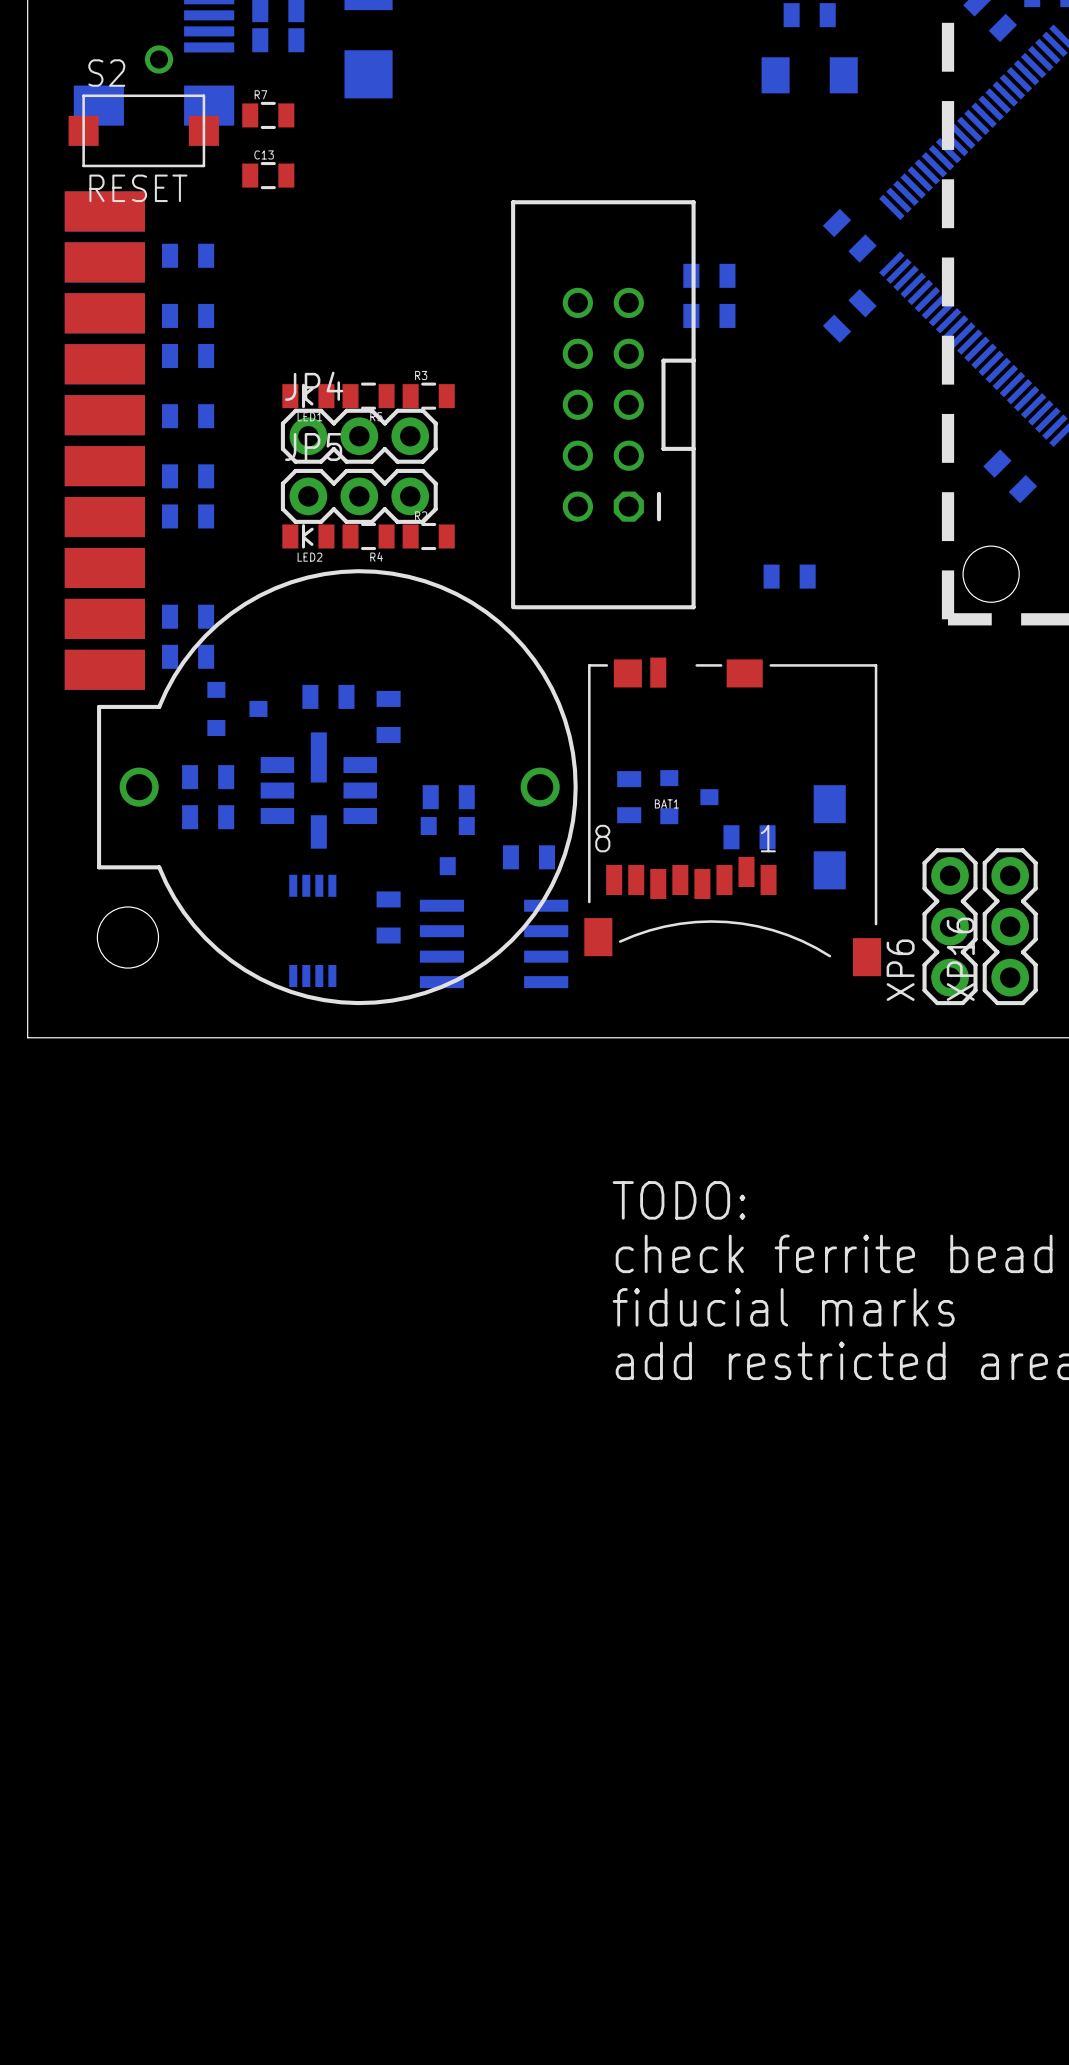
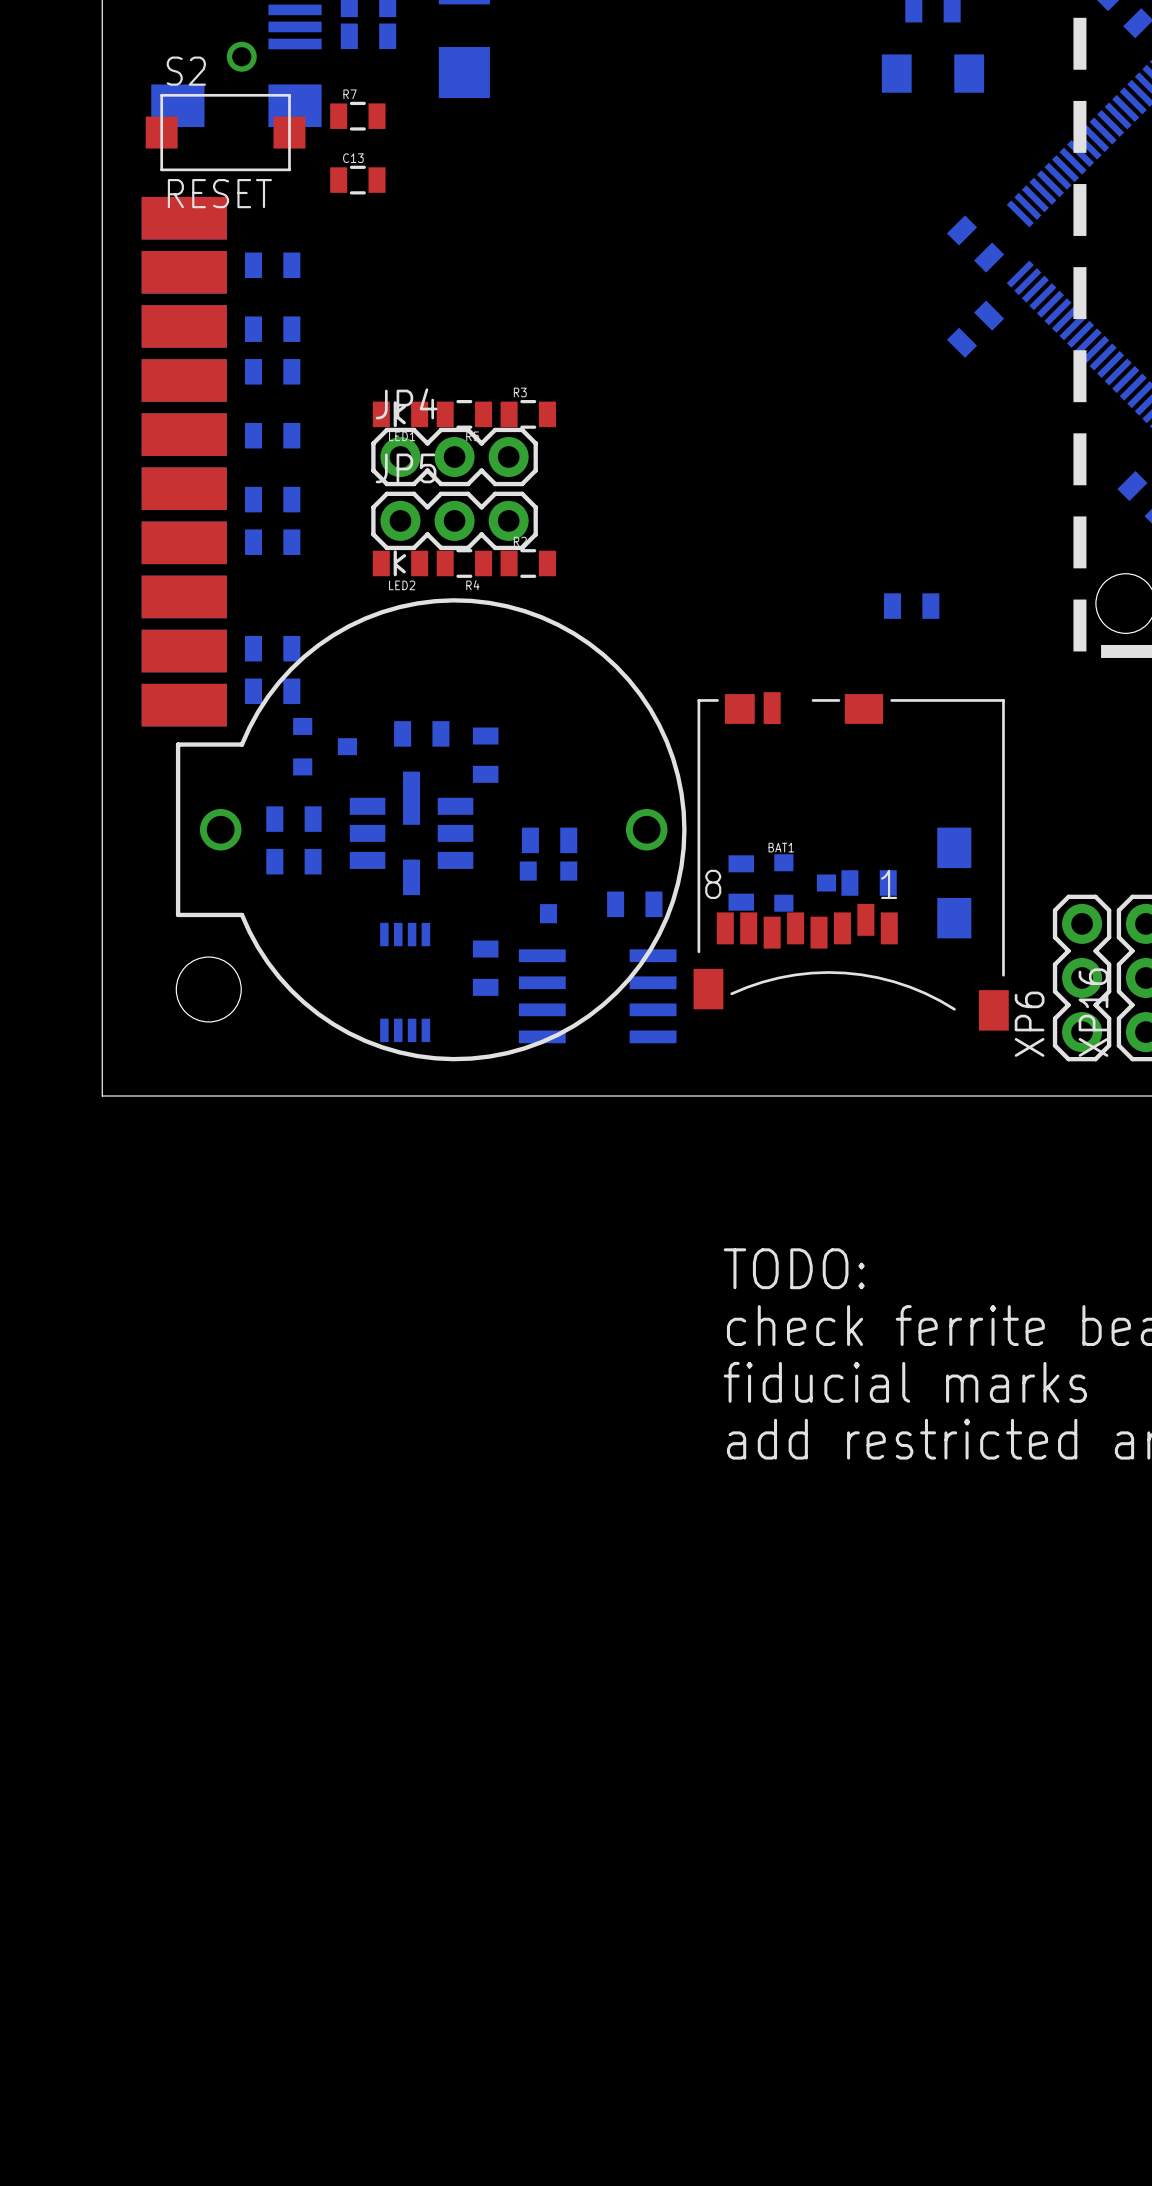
part: (709, 275) -> none
part: (709, 315) -> none
part: (603, 404) -> none
part position: (629, 797) -> (741, 882)
part position: (689, 797) -> (805, 882)

